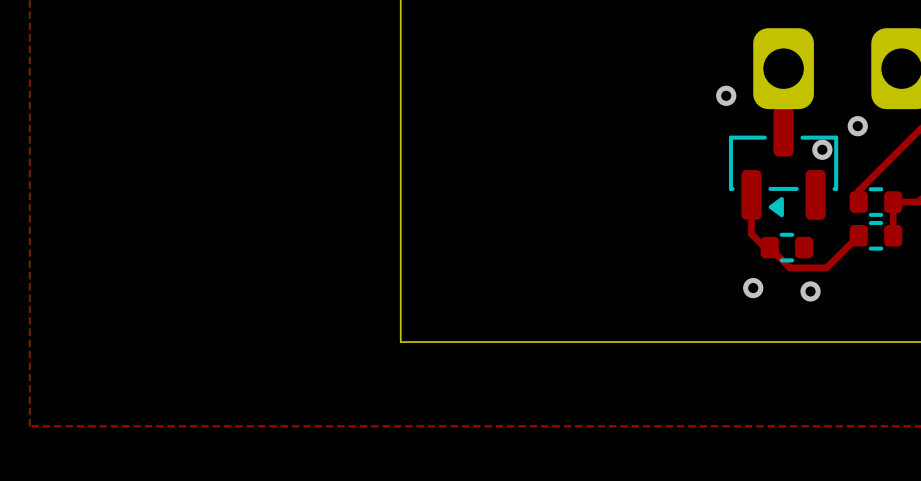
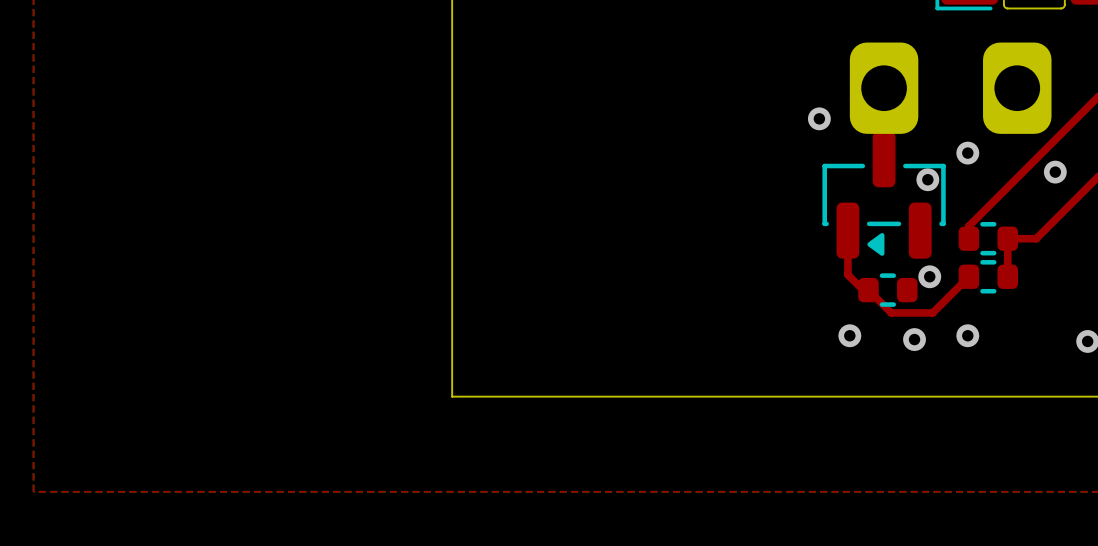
via: none -> (929, 276)
via: none -> (967, 335)

